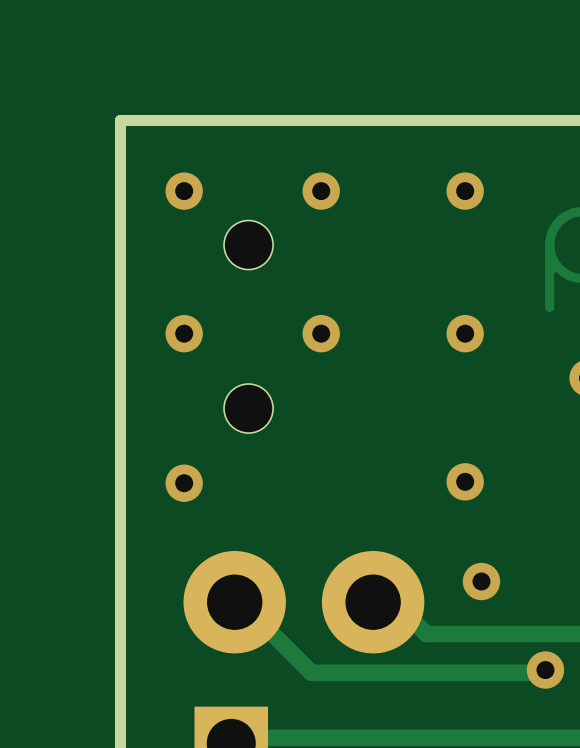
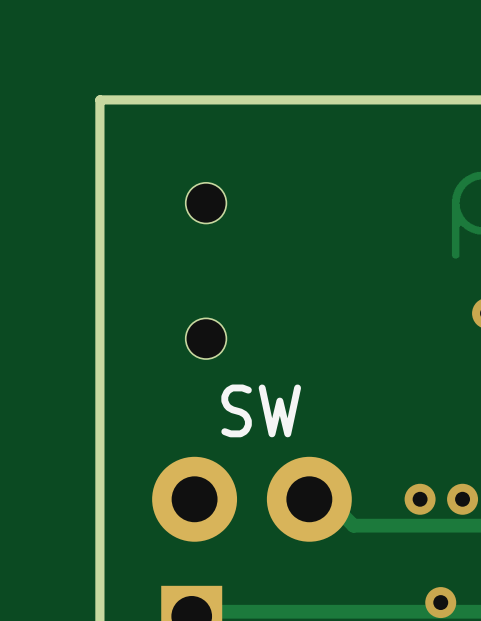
via: (184, 191) -> none
via: (321, 191) -> none
via: (465, 191) -> none
via: (184, 333) -> none
via: (321, 333) -> none
via: (465, 333) -> none
via: (465, 481) -> none
via: (184, 483) -> none
text: none -> SW (261, 410)
via position: (481, 581) -> (420, 499)
track: (234, 602) (240, 602) (311, 672) (541, 672) (545, 670) -> none
via: none -> (462, 499)
via: (545, 670) -> none
via: none -> (440, 602)

